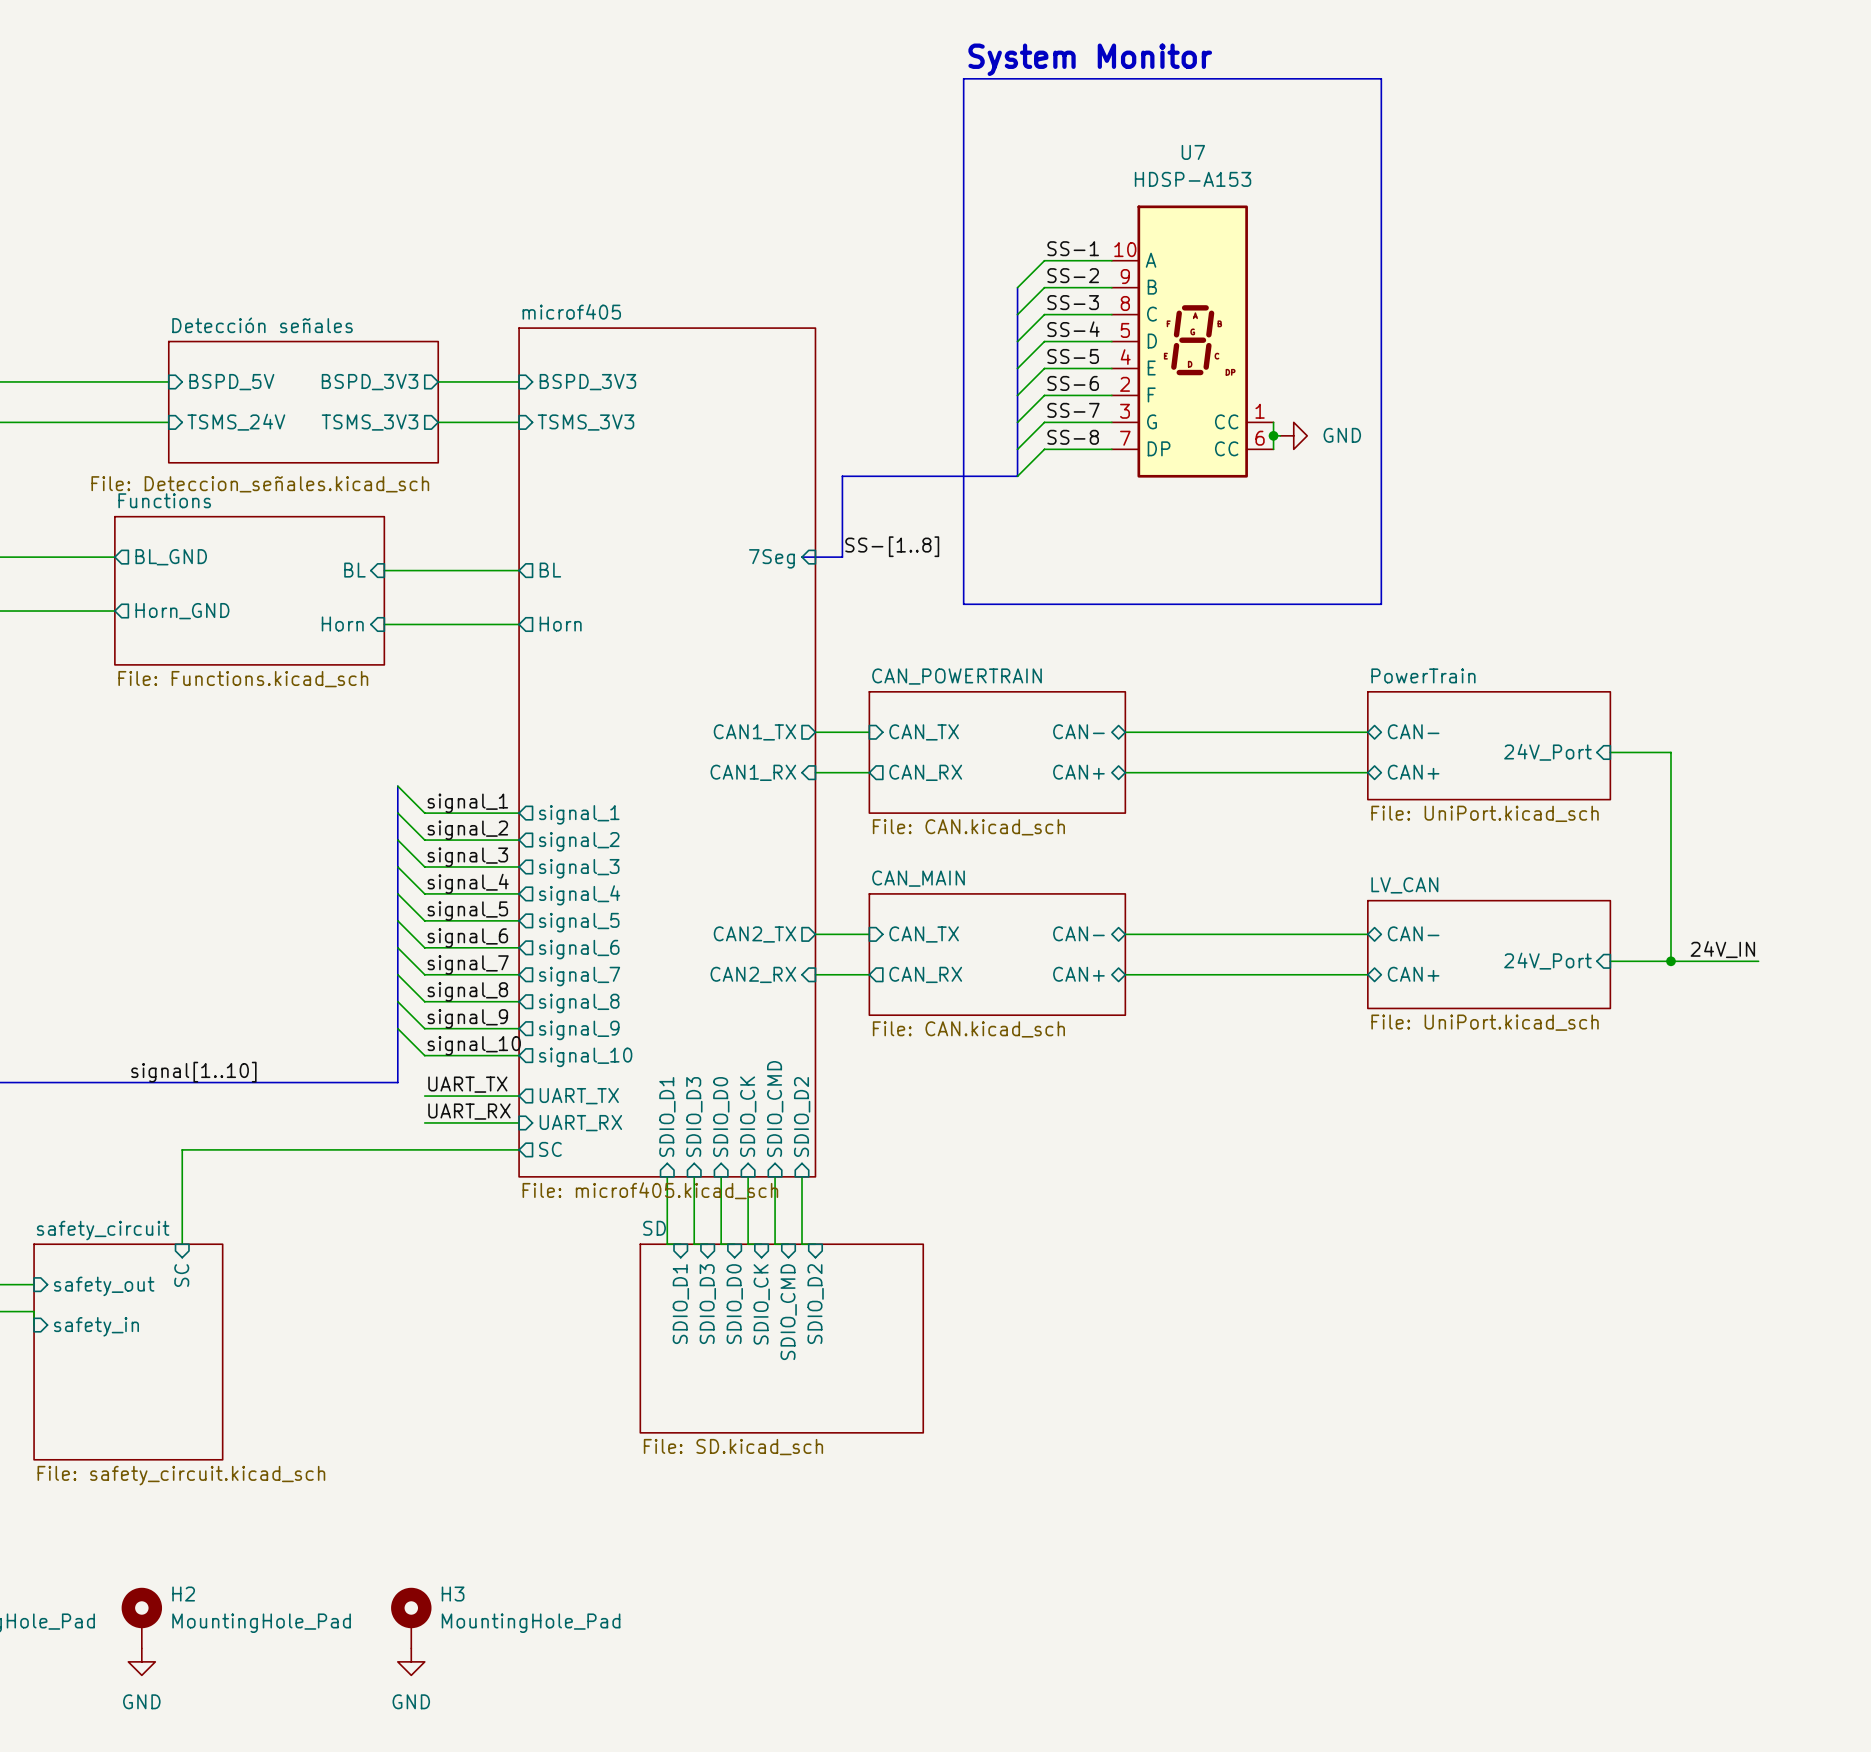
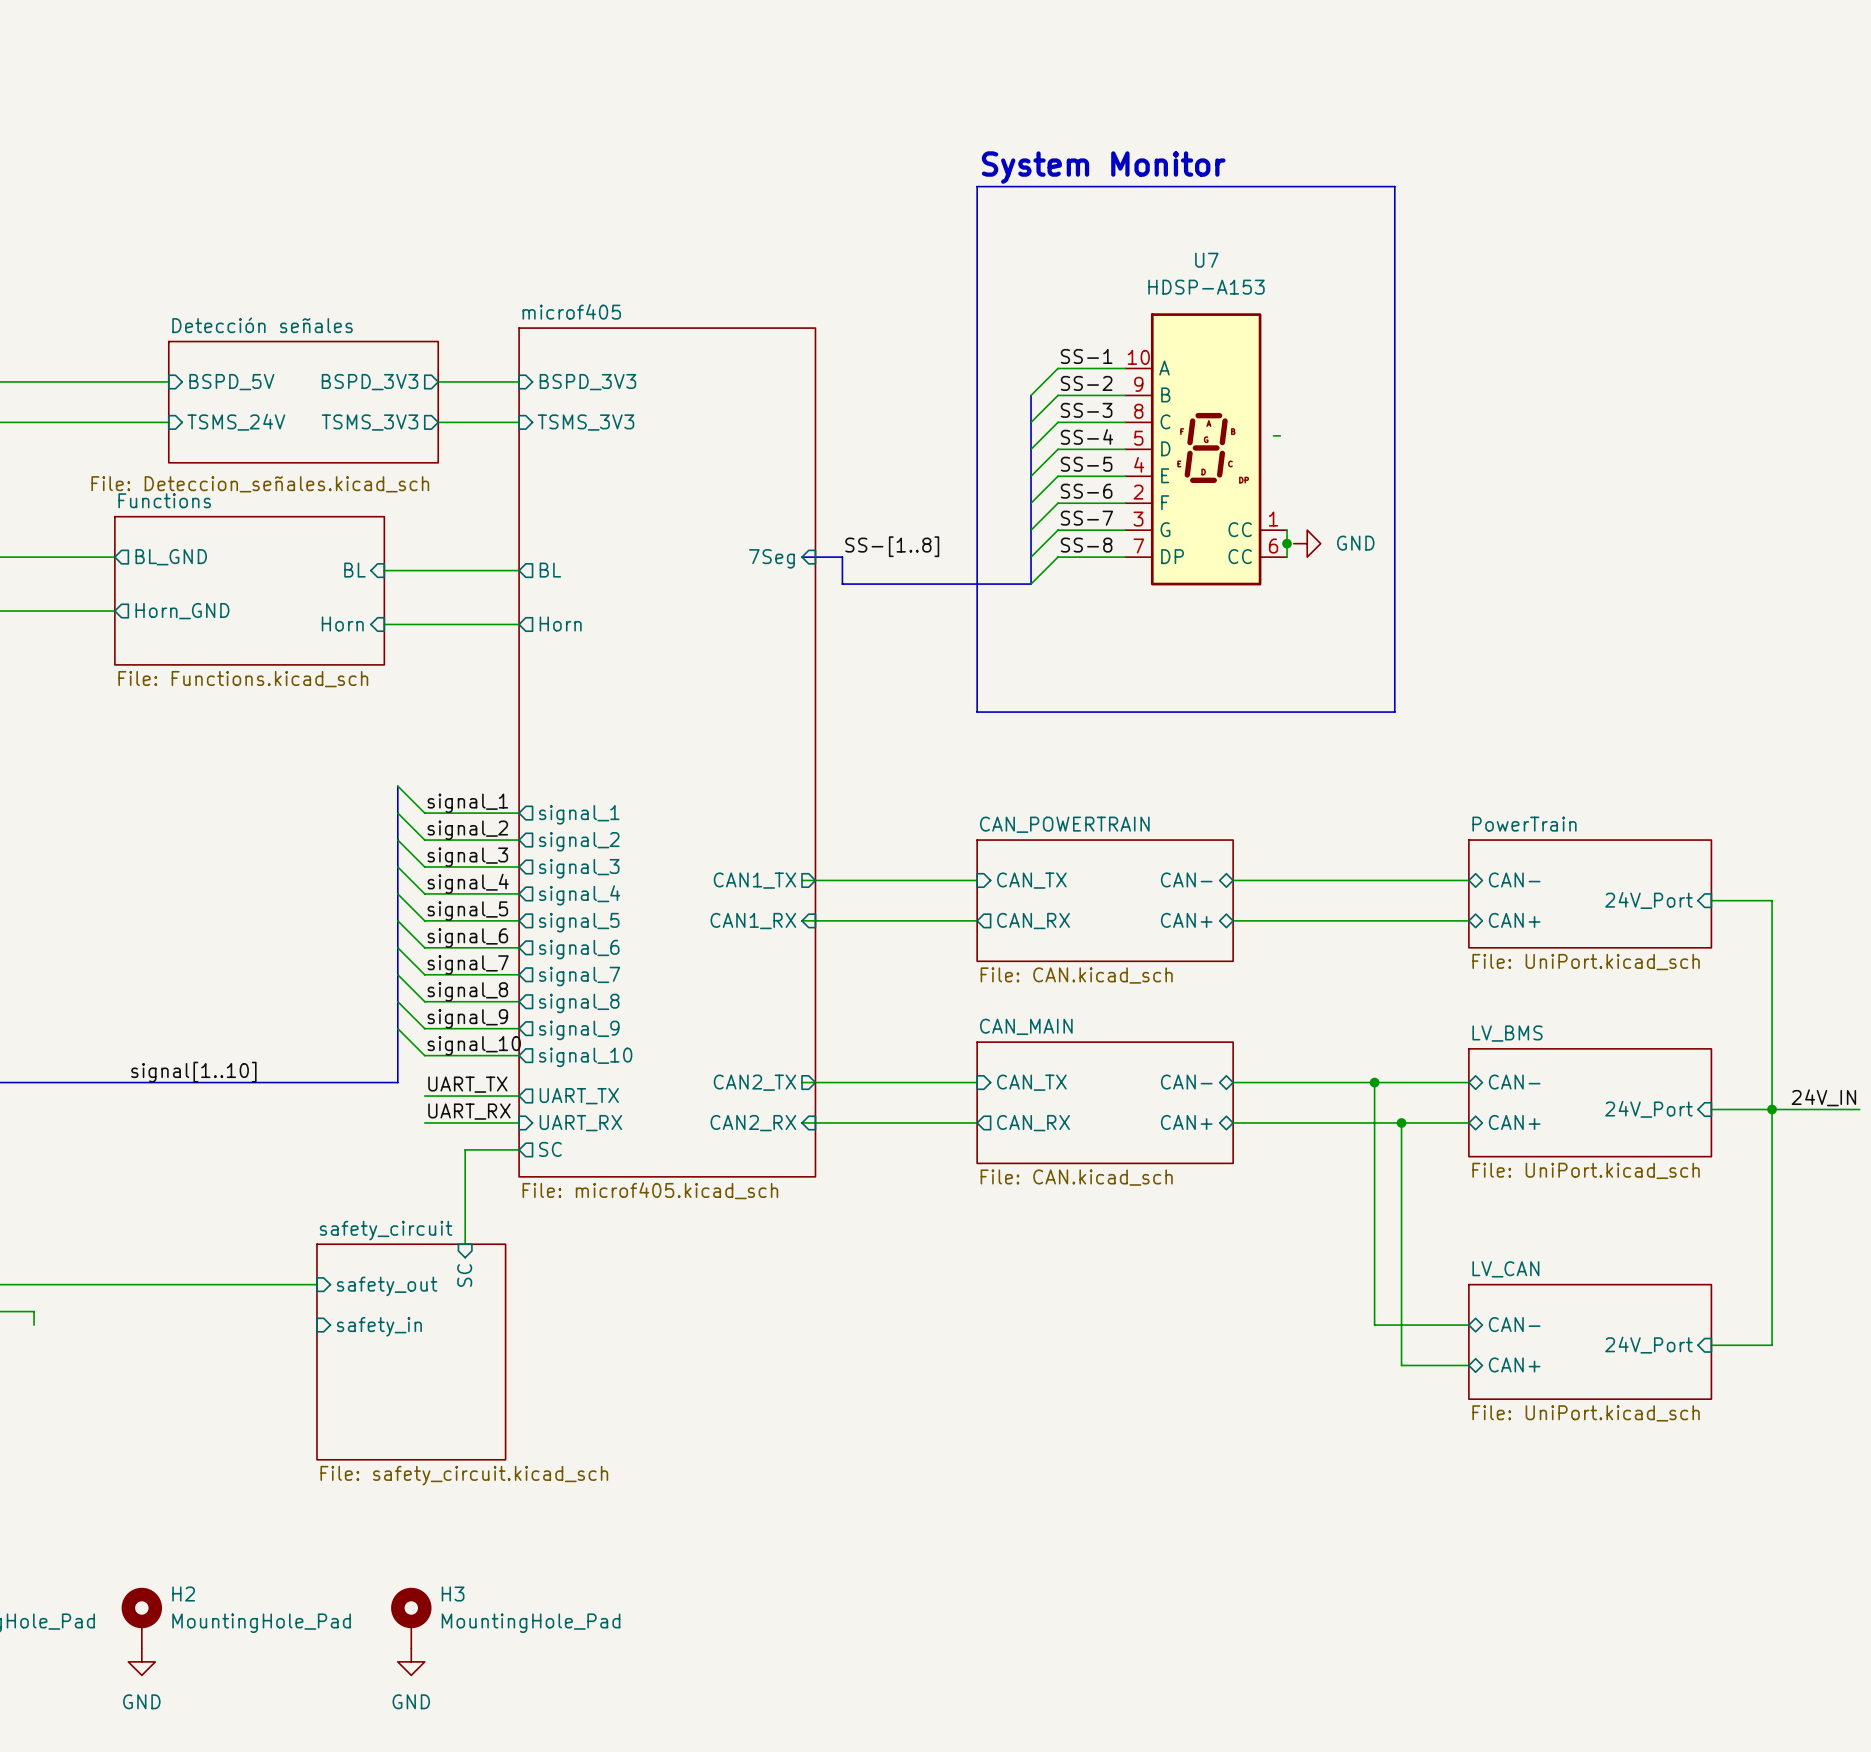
text position: System Monitor (1090, 59) -> System Monitor (1103, 167)
line: (963, 78) (1381, 78) (1381, 604) (963, 604) (963, 78) -> (977, 186) (1394, 186) (1394, 712) (977, 712) (977, 186)
label position: SS-1 (1073, 248) -> SS-1 (1086, 356)
wire: (1111, 260) (1044, 260) (1017, 287) -> (1125, 476) (1057, 476) (1031, 503)
label position: SS-2 (1073, 275) -> SS-2 (1086, 383)
bus: (1017, 287) (1017, 476) (842, 476) (842, 557) -> (1031, 395) (1031, 584) (842, 584) (842, 557)
wire: (1111, 287) (1044, 287) (1017, 314) -> (1125, 503) (1057, 503) (1031, 530)
label position: SS-3 (1073, 302) -> SS-3 (1086, 410)
wire: (1111, 314) (1044, 314) (1017, 341) -> (1125, 530) (1057, 530) (1031, 557)
label position: SS-4 (1073, 329) -> SS-4 (1086, 436)
wire: (1111, 341) (1044, 341) (1017, 368) -> (1125, 557) (1057, 557) (1031, 584)
U7 position: (1192, 341) -> (1206, 449)
label position: SS-5 (1073, 356) -> SS-5 (1086, 464)
wire: (1057, 368) (1044, 368) (1017, 395) -> (1057, 368) (1031, 395)
label position: SS-6 (1073, 383) -> SS-6 (1086, 491)
wire: (1057, 395) (1044, 395) (1017, 422) -> (1057, 395) (1031, 422)
label position: SS-7 (1073, 410) -> SS-7 (1086, 518)
wire: (1057, 422) (1044, 422) (1017, 449) -> (1057, 422) (1031, 449)
wire: (1273, 422) (1273, 449) -> (1287, 530) (1287, 557)
junction: (1273, 435) -> none
power symbol position: GND (1293, 435) -> GND (1307, 543)
label position: SS-8 (1073, 437) -> SS-8 (1086, 545)
wire: (1057, 449) (1044, 449) (1017, 476) -> (1057, 449) (1031, 476)
junction: none -> (1287, 543)
sheet pin: CAN- (1078, 731) -> none
sheet pin: CAN- (1413, 731) -> none
sheet pin position: CAN1_TX (754, 732) -> CAN1_TX (754, 880)
wire: (815, 732) (869, 732) -> none
sheet pin: CAN_TX (924, 732) -> none
wire: (1125, 732) (1367, 732) -> none
sheet PowerTrain position: (1489, 745) -> (1590, 893)
sheet CAN_POWERTRAIN position: (997, 752) -> (1105, 900)
sheet pin: 24V_Port (1547, 752) -> none
wire: (1610, 752) (1670, 752) (1670, 961) -> none
sheet pin position: CAN1_RX (753, 772) -> CAN1_RX (753, 921)
wire: (815, 772) (869, 772) -> none
sheet pin: CAN_RX (925, 772) -> none
sheet pin: CAN+ (1078, 772) -> none
wire: (1125, 772) (1367, 772) -> none
sheet pin: CAN+ (1413, 772) -> none
sheet pin: none -> CAN- (1186, 879)
sheet pin: none -> CAN- (1514, 879)
wire: none -> (801, 880) (977, 880)
sheet pin: none -> CAN_TX (1031, 880)
wire: none -> (1233, 880) (1468, 880)
sheet pin: none -> 24V_Port (1648, 900)
wire: none -> (1711, 900) (1772, 900) (1772, 1345) (1711, 1345)
wire: none -> (801, 920) (977, 920)
sheet pin: none -> CAN+ (1186, 920)
wire: none -> (1233, 920) (1468, 920)
sheet pin: none -> CAN+ (1514, 920)
sheet pin: none -> CAN_RX (1033, 921)
sheet pin: CAN- (1078, 933) -> none
sheet pin: CAN- (1413, 933) -> none
sheet pin position: CAN2_TX (754, 934) -> CAN2_TX (754, 1082)
wire: (815, 934) (869, 934) -> none
sheet pin: CAN_TX (924, 934) -> none
wire: (1125, 934) (1367, 934) -> none
label position: 24V_IN (1722, 949) -> 24V_IN (1823, 1097)
sheet CAN_MAIN position: (997, 954) -> (1105, 1102)
sheet LV_CAN: File: UniPort.kicad_sch (1489, 954) -> none
sheet pin: 24V_Port (1547, 961) -> none
wire: (1610, 961) (1758, 961) -> (1711, 1109) (1859, 1109)
junction: (1670, 961) -> none
sheet pin position: CAN2_RX (753, 974) -> CAN2_RX (753, 1123)
wire: (815, 974) (869, 974) -> none
sheet pin: CAN_RX (925, 974) -> none
sheet pin: CAN+ (1078, 974) -> none
wire: (1125, 974) (1367, 974) -> none
sheet pin: CAN+ (1413, 974) -> none
wire: none -> (801, 1082) (977, 1082)
sheet pin: none -> CAN_TX (1031, 1082)
sheet pin: none -> CAN- (1186, 1082)
wire: none -> (1233, 1082) (1468, 1082)
wire: none -> (1374, 1082) (1374, 1325) (1468, 1325)
junction: none -> (1374, 1082)
sheet pin: none -> CAN- (1514, 1082)
sheet LV_BMS: none -> File: UniPort.kicad_sch (1590, 1102)
sheet pin: SDIO_CMD (775, 1108) -> none
sheet pin: none -> 24V_Port (1648, 1109)
junction: none -> (1772, 1109)
sheet pin: SDIO_D1 (667, 1116) -> none
sheet pin: SDIO_D3 (694, 1116) -> none
sheet pin: SDIO_D0 (721, 1116) -> none
sheet pin: SDIO_CK (748, 1116) -> none
sheet pin: SDIO_D2 (802, 1116) -> none
wire: none -> (801, 1122) (977, 1122)
sheet pin: none -> CAN+ (1186, 1122)
wire: none -> (1233, 1122) (1468, 1122)
wire: none -> (1401, 1122) (1401, 1365) (1468, 1365)
junction: none -> (1401, 1122)
sheet pin: none -> CAN+ (1514, 1122)
sheet pin: none -> CAN_RX (1033, 1123)
wire: (465, 1149) (182, 1149) (182, 1244) -> (465, 1149) (465, 1244)
wire: (667, 1176) (667, 1244) (680, 1244) -> none
wire: (694, 1176) (694, 1244) (707, 1244) -> none
wire: (721, 1176) (721, 1244) (734, 1244) -> none
wire: (748, 1176) (748, 1244) (761, 1244) -> none
wire: (775, 1176) (775, 1244) (788, 1244) -> none
wire: (801, 1176) (801, 1244) (815, 1244) -> none
sheet pin: SC (181, 1275) -> none
sheet pin: none -> SC (464, 1275)
wire: none -> (34, 1284) (316, 1284)
sheet pin: safety_out (104, 1286) -> none
sheet pin: none -> safety_out (387, 1286)
sheet pin: SDIO_D1 (680, 1304) -> none
sheet pin: SDIO_D3 (707, 1304) -> none
sheet pin: SDIO_D0 (734, 1304) -> none
sheet pin: SDIO_CK (761, 1304) -> none
sheet pin: SDIO_D2 (815, 1304) -> none
sheet pin: SDIO_CMD (788, 1312) -> none
sheet pin: none -> CAN- (1514, 1324)
sheet pin: safety_in (96, 1326) -> none
sheet pin: none -> safety_in (379, 1326)
sheet SD: File: SD.kicad_sch (781, 1338) -> none
sheet LV_CAN: none -> File: UniPort.kicad_sch (1590, 1341)
sheet pin: none -> 24V_Port (1648, 1345)
sheet safety_circuit: File: safety_circuit.kicad_sch (128, 1352) -> none
sheet safety_circuit: none -> File: safety_circuit.kicad_sch (411, 1352)
sheet pin: none -> CAN+ (1514, 1364)

